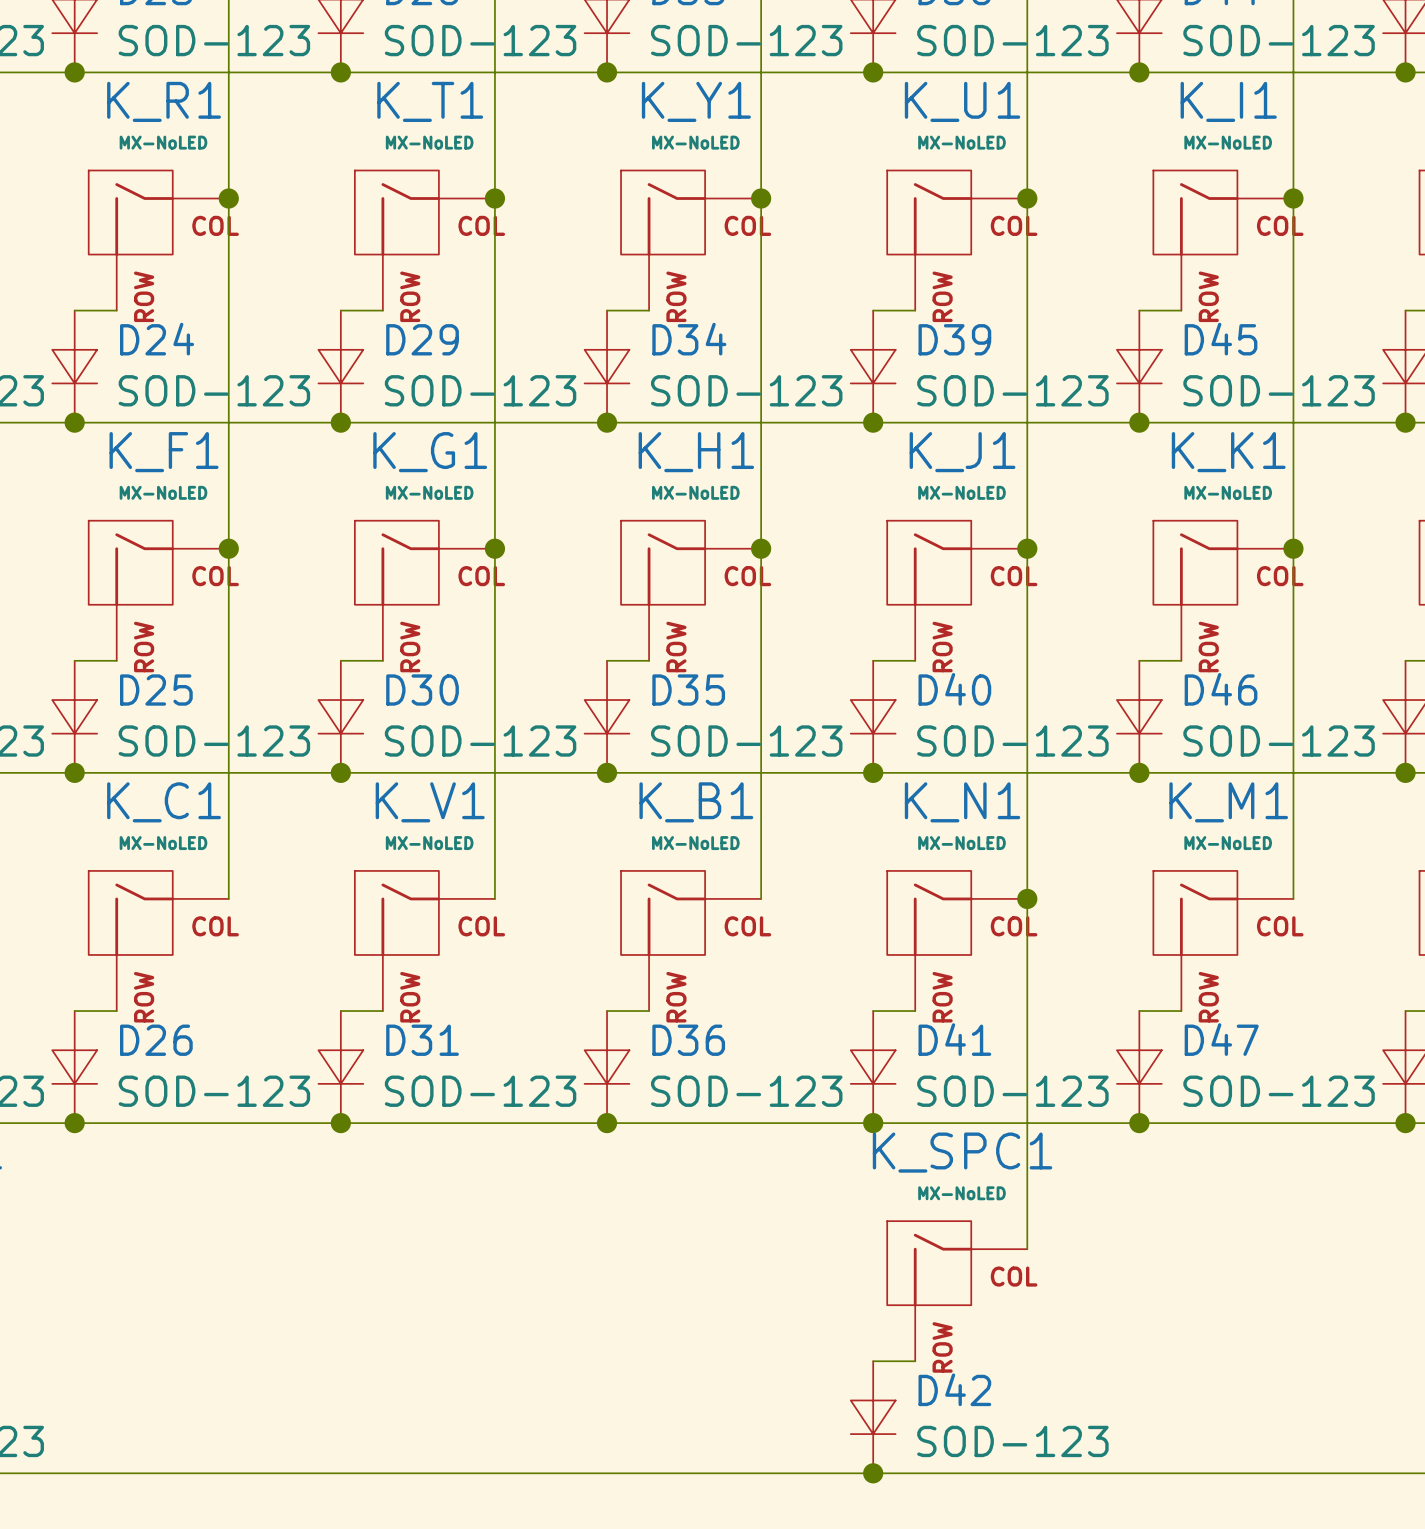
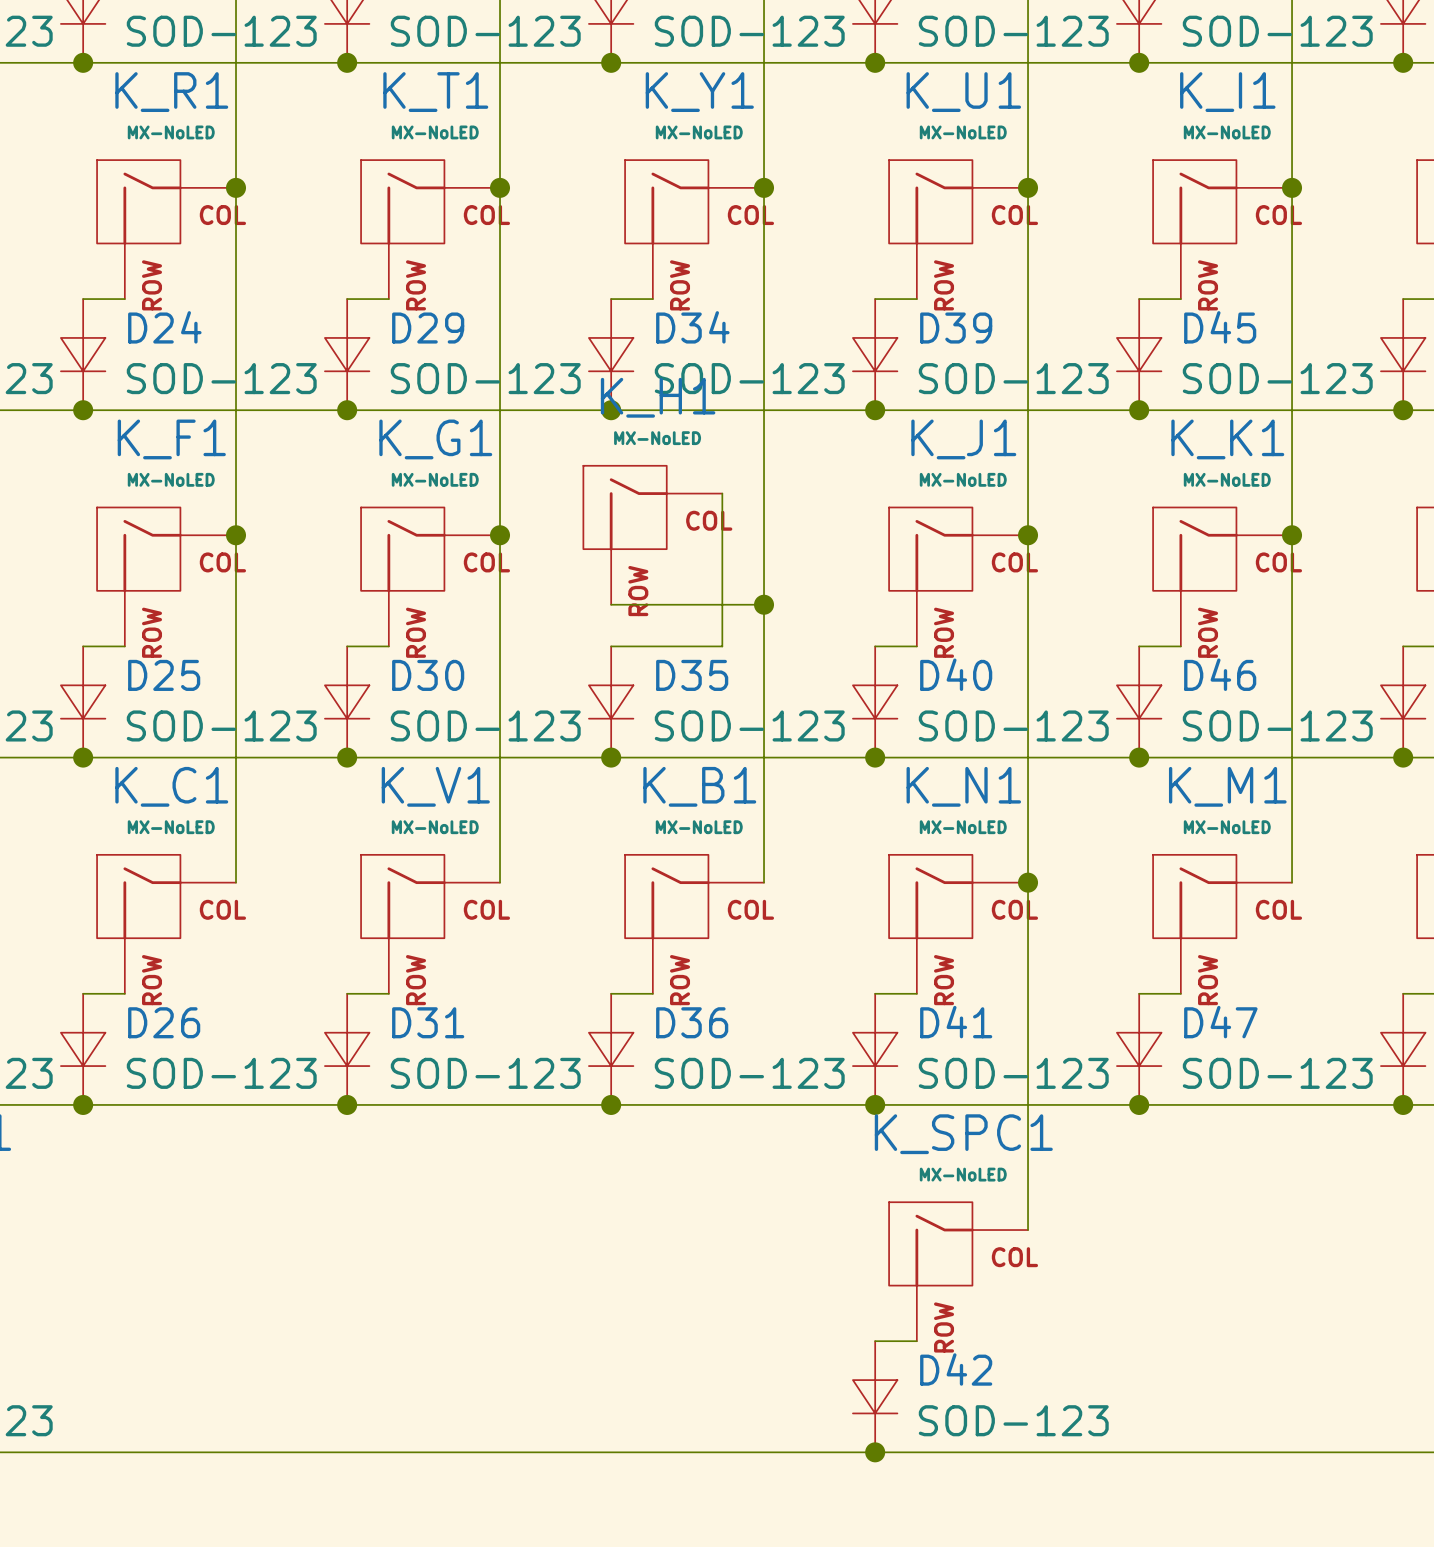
wire: none -> (722, 493) (722, 646) (652, 646)
junction position: (761, 548) -> (764, 604)
K_H1 position: (691, 590) -> (652, 535)
wire: none -> (611, 604) (764, 604)

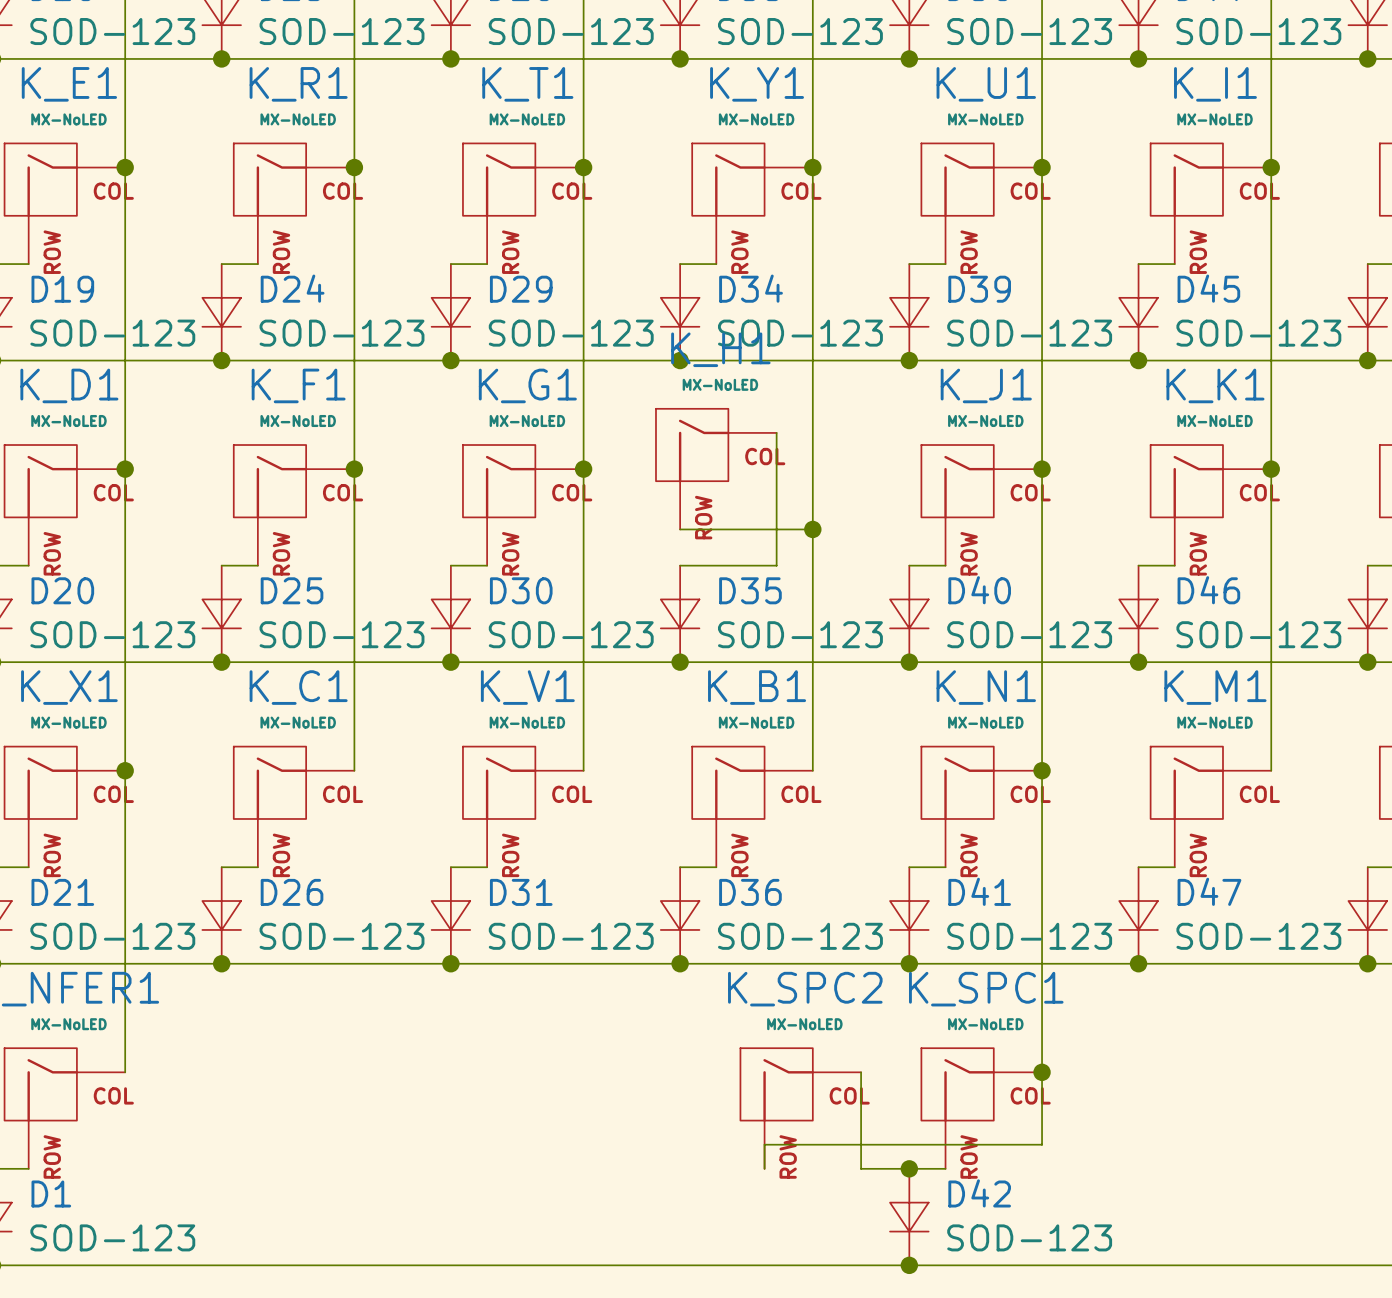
wire: none -> (861, 1072) (861, 1168) (909, 1168)
wire: none -> (1042, 1072) (1042, 1144) (764, 1144) (764, 1168)
junction: none -> (1042, 1072)
K_SPC2: none -> MX-NoLED (800, 1108)
junction: none -> (909, 1168)

